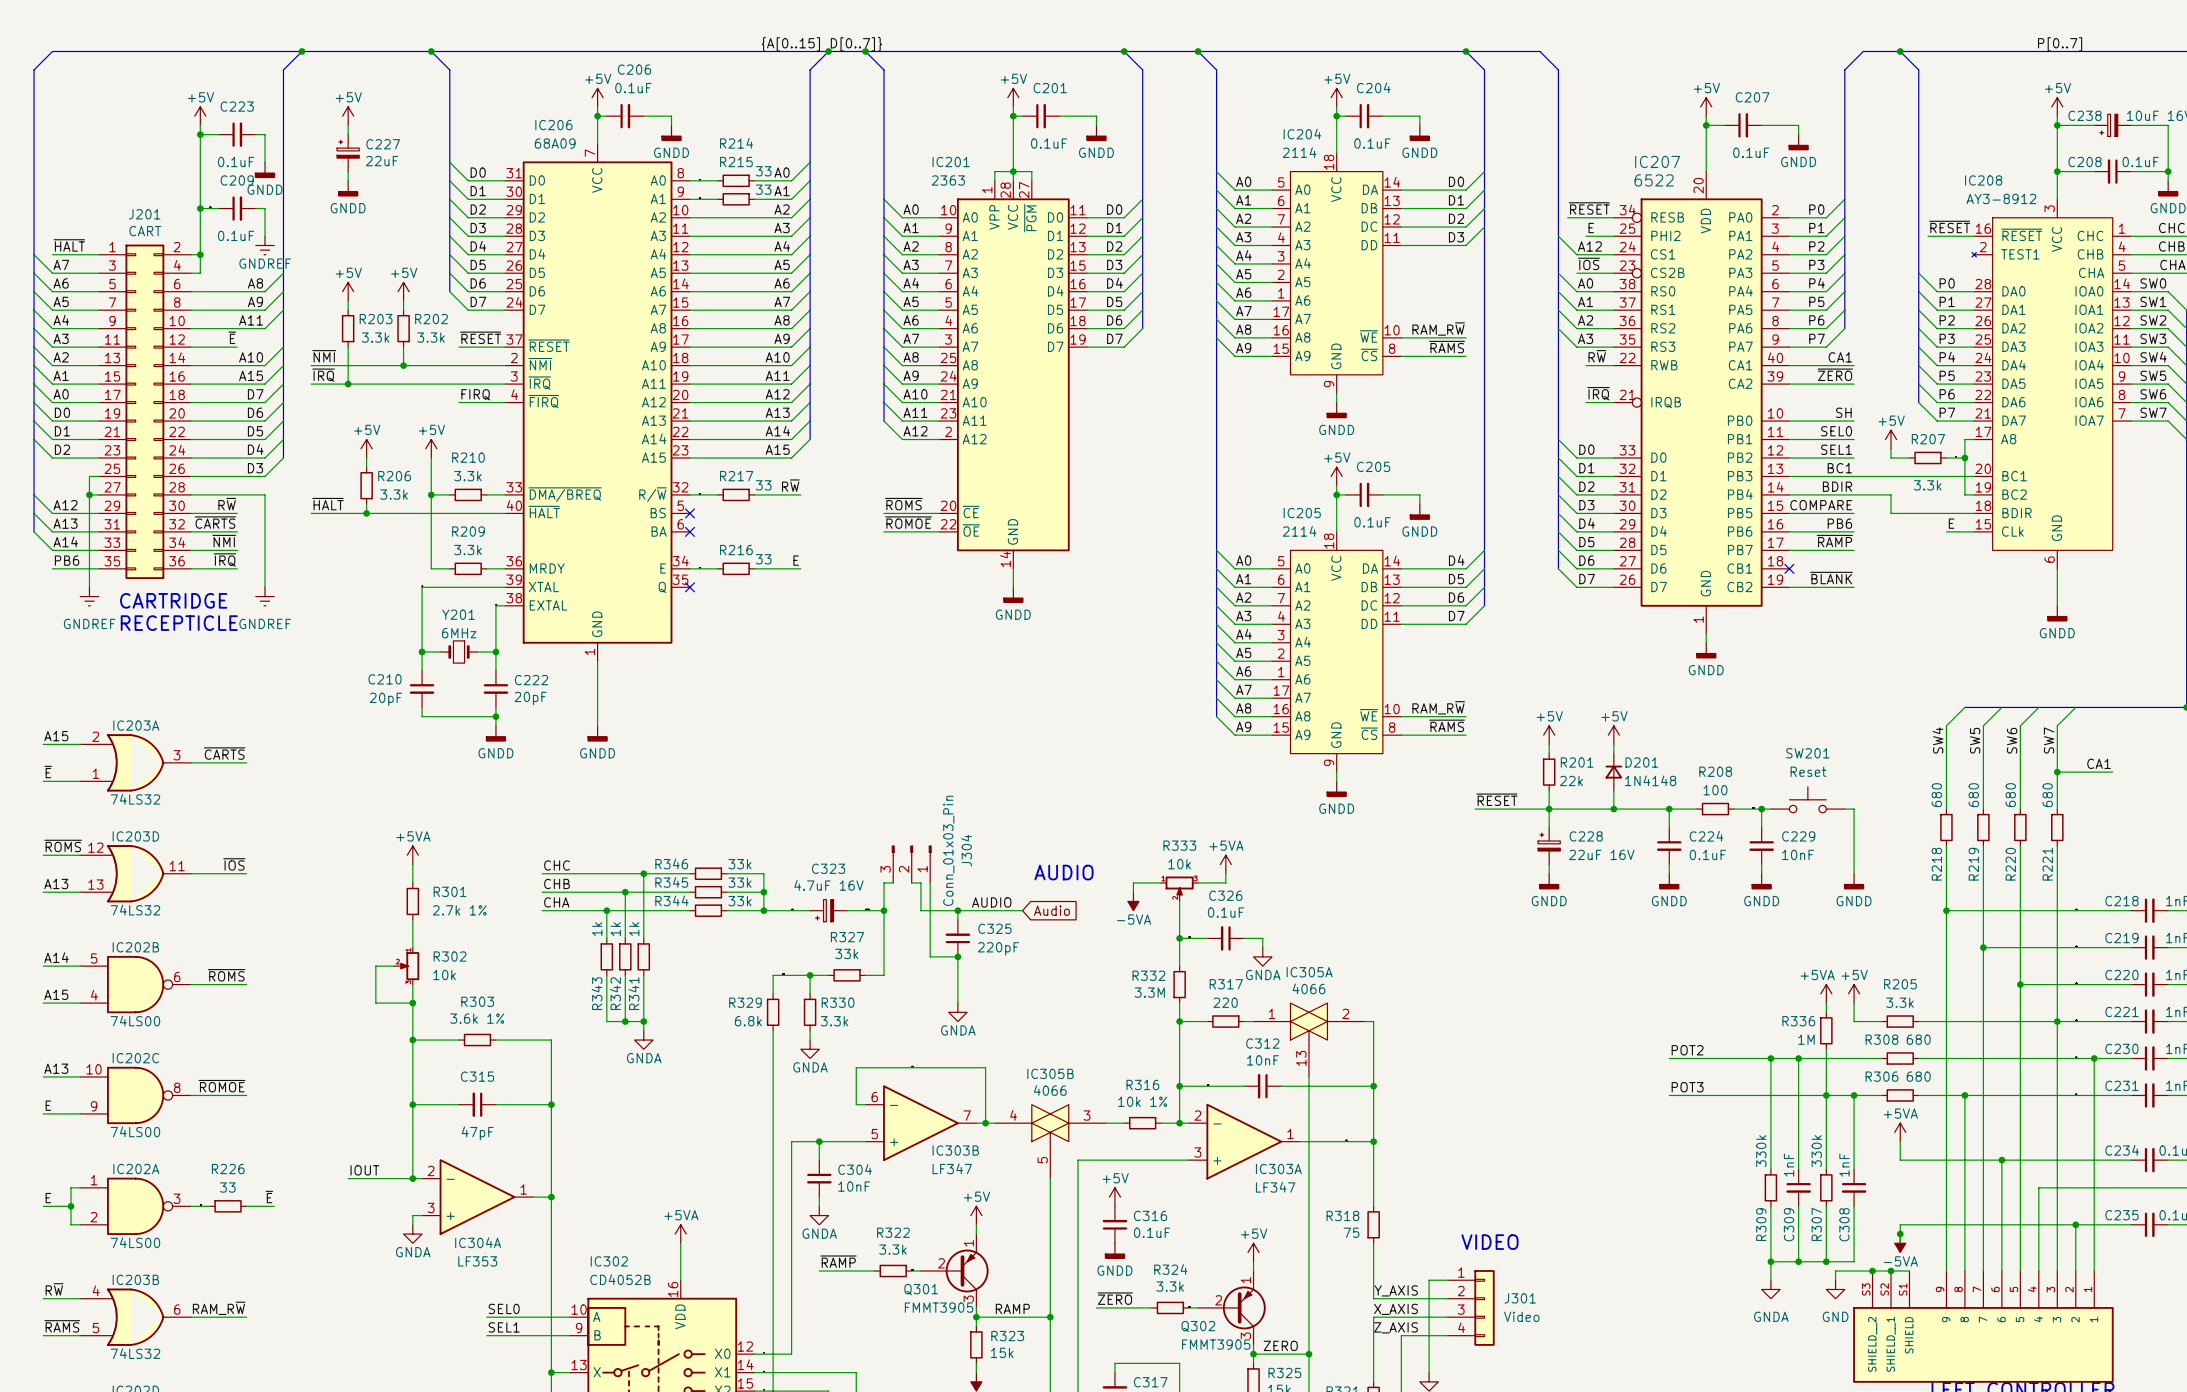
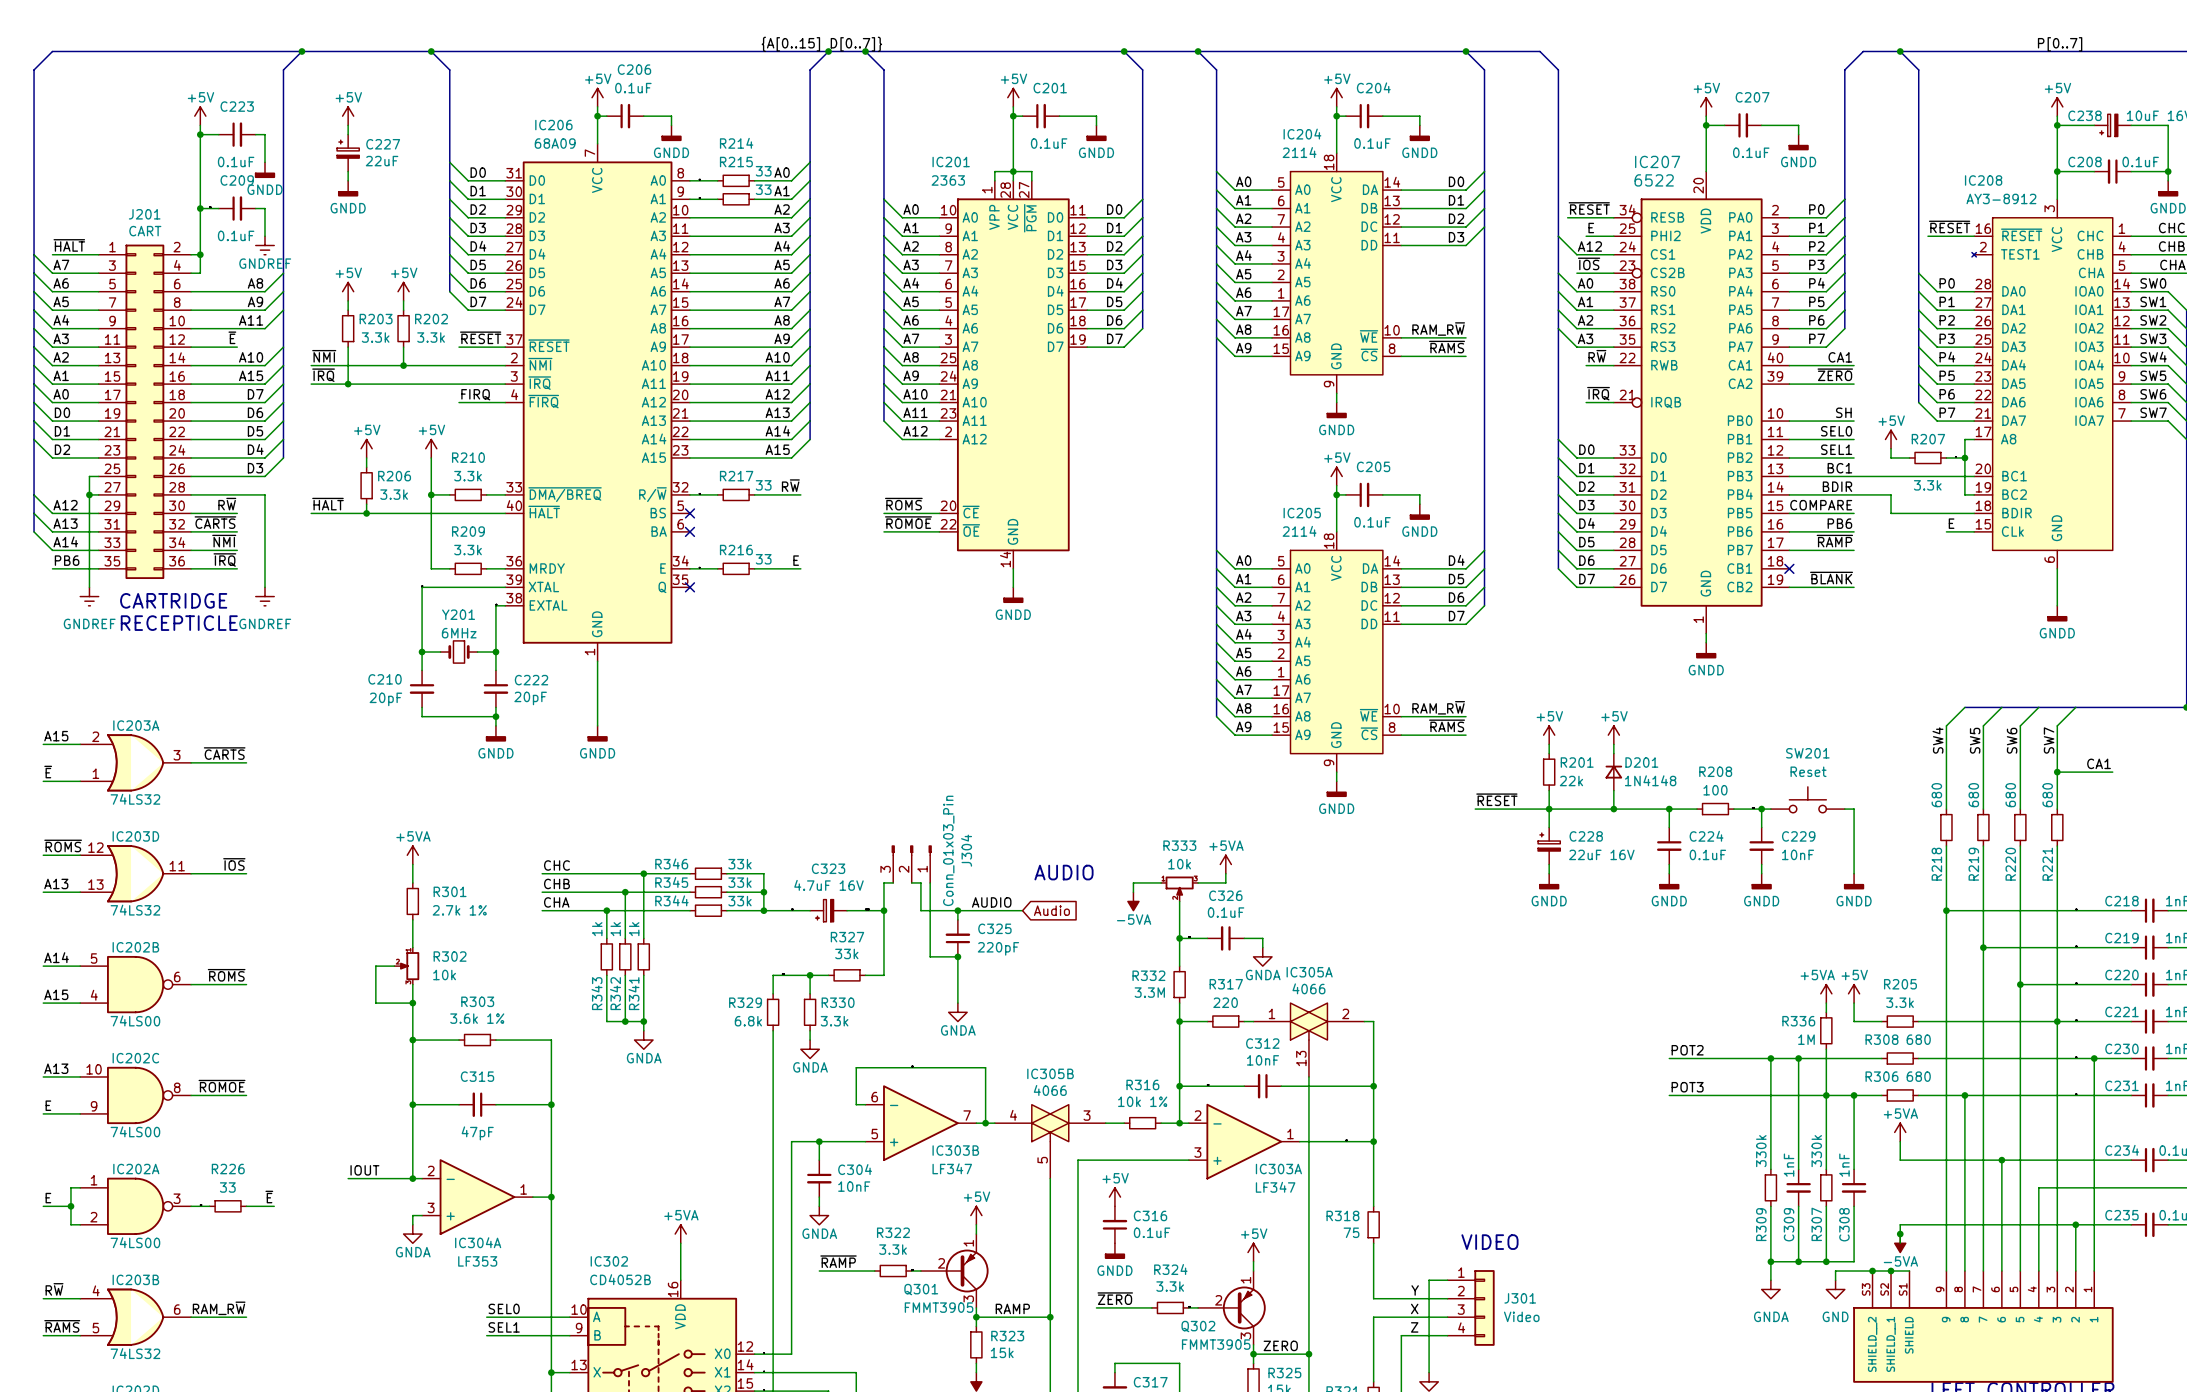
label: Y_AXIS (1396, 1290) -> Y (1415, 1290)
label: X_AXIS (1396, 1309) -> X (1414, 1308)
label: Z_AXIS (1396, 1327) -> Z (1414, 1327)

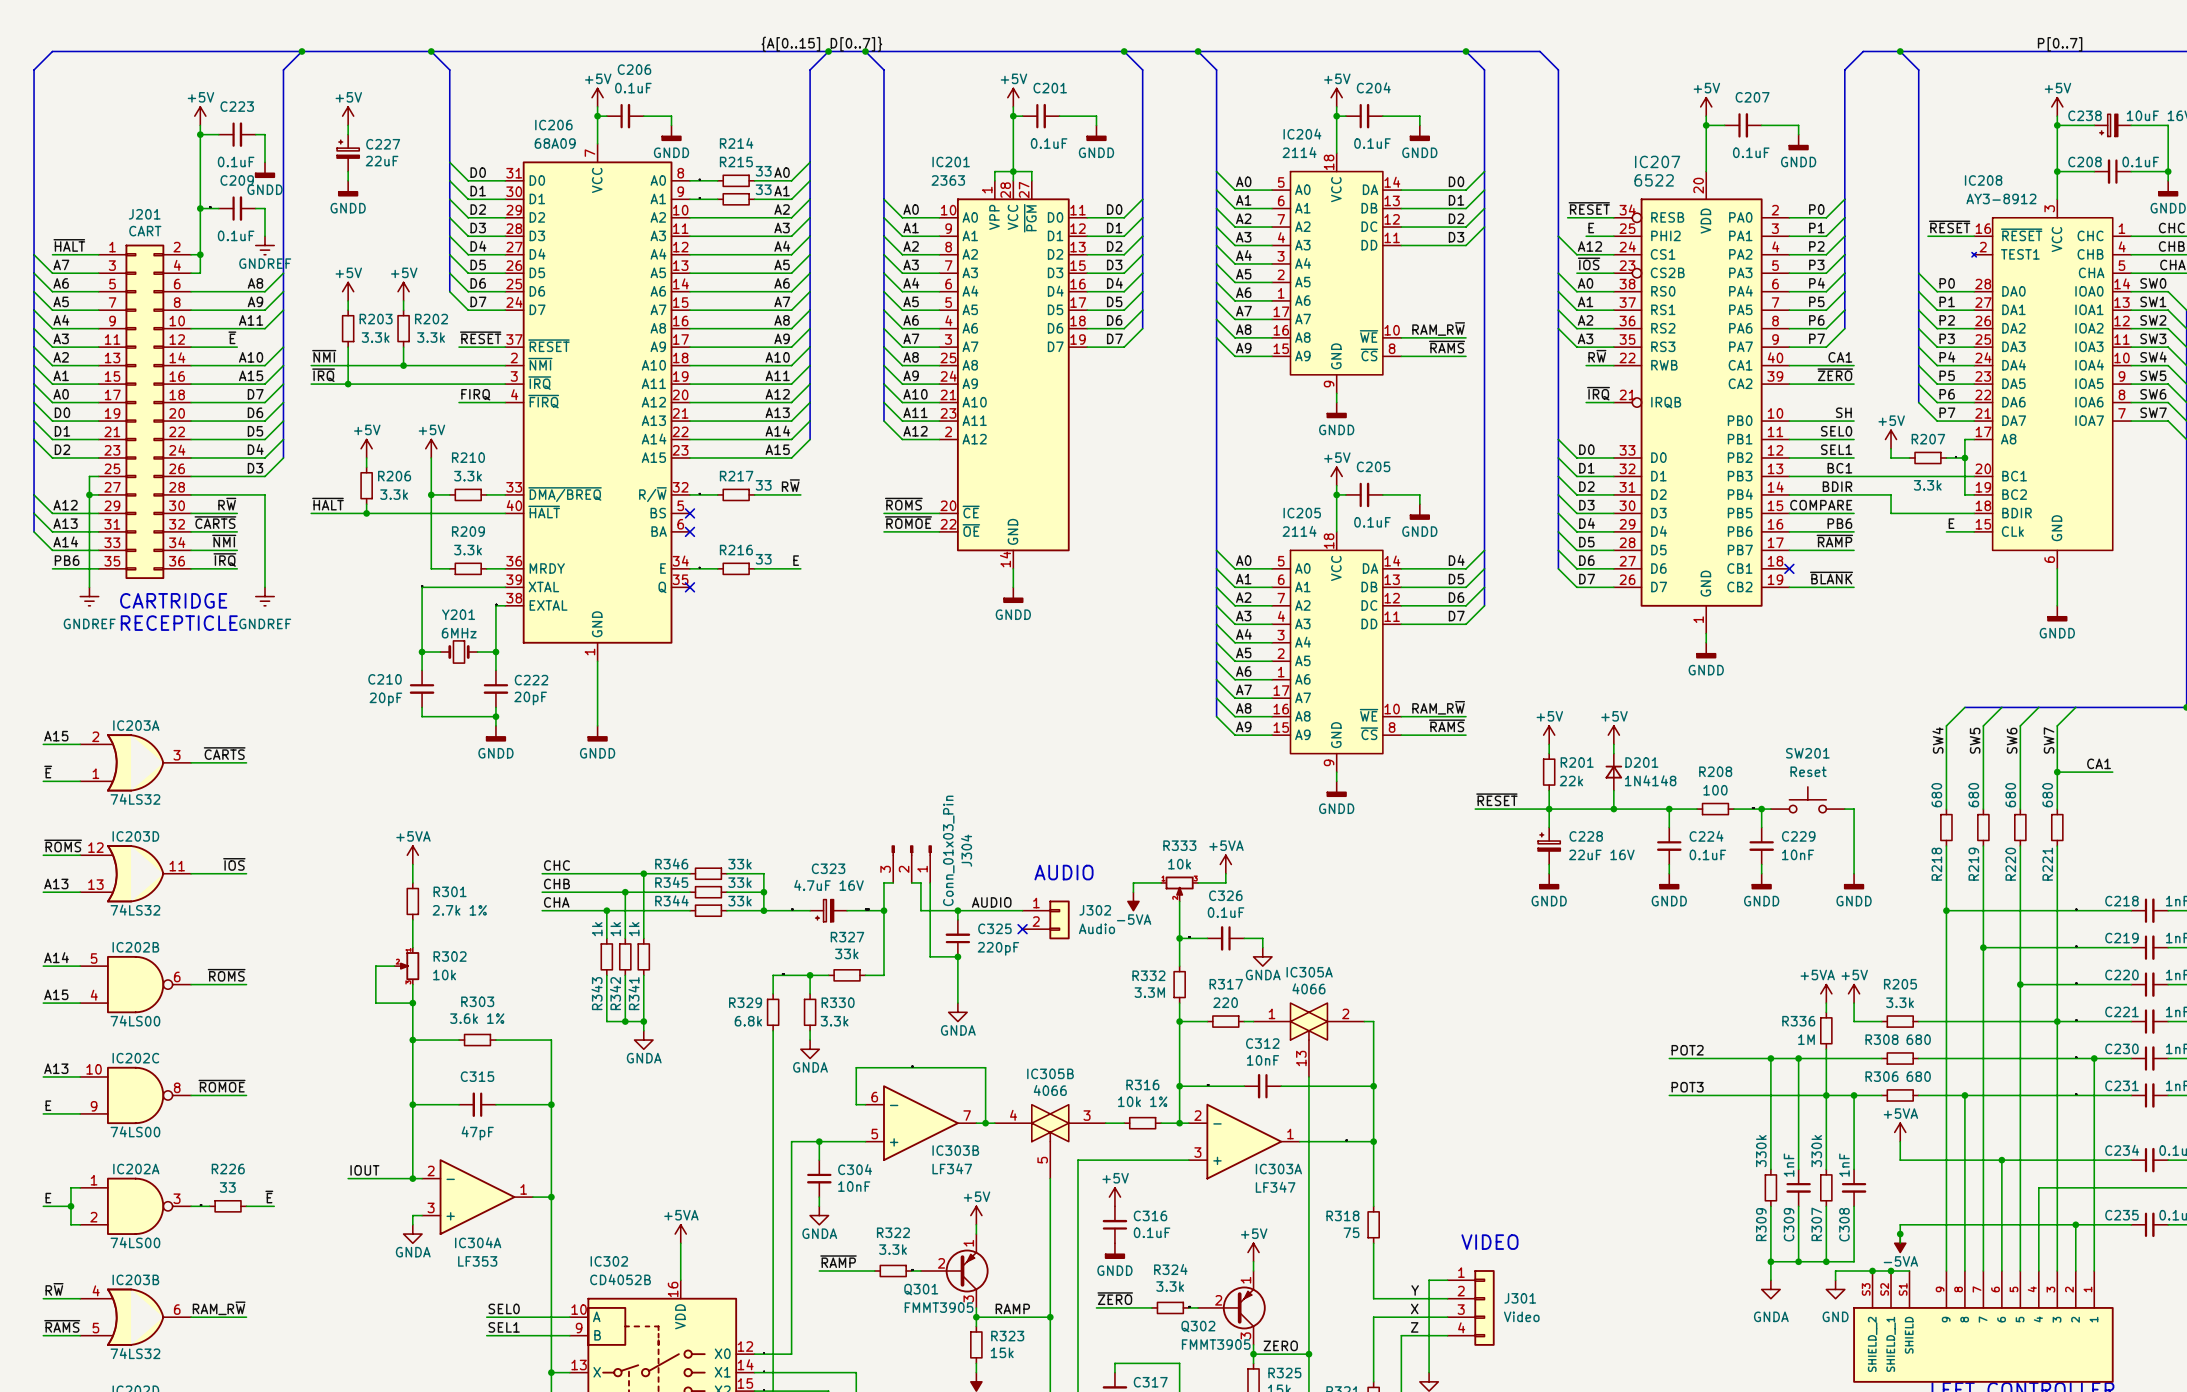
global label: Audio (1051, 910) -> none
J302: none -> Audio (1046, 919)
no-connect mark: none -> (1022, 929)

